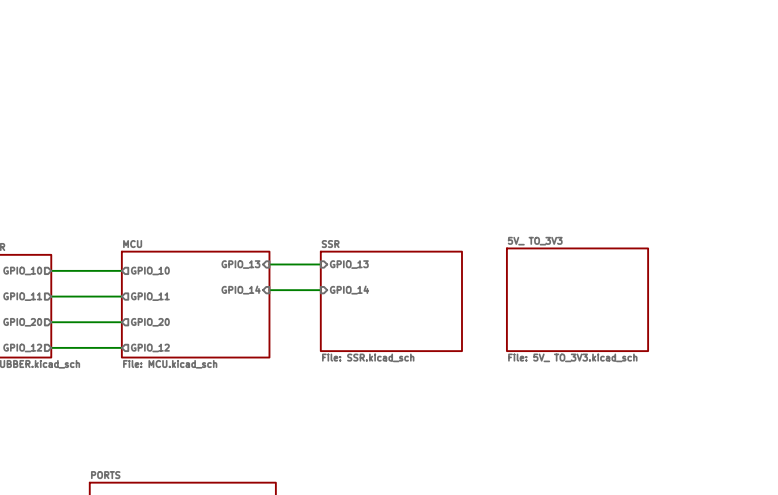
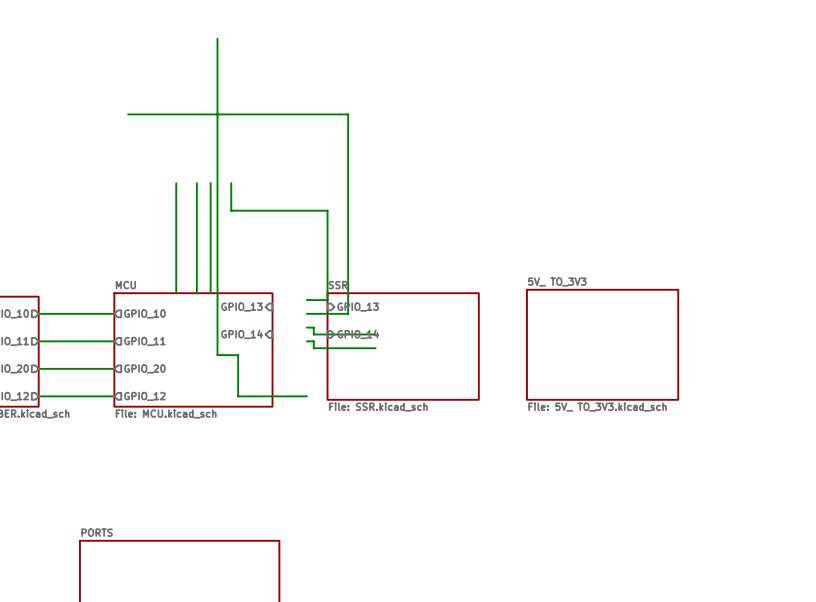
wire: none -> (217, 38) (217, 355) (238, 355) (238, 396) (306, 396)
wire: none -> (128, 114) (348, 114) (348, 313) (306, 313)
wire: none -> (176, 183) (176, 293)
wire: none -> (196, 183) (196, 293)
wire: none -> (210, 183) (210, 293)
wire: none -> (231, 183) (231, 210) (327, 210) (327, 300) (306, 300)
wire: (269, 264) (320, 264) -> none
wire: (269, 290) (307, 290) -> (306, 327) (313, 327) (313, 334)
wire: none -> (327, 334) (375, 334)
wire: none -> (306, 341) (313, 341) (313, 348) (375, 348)

